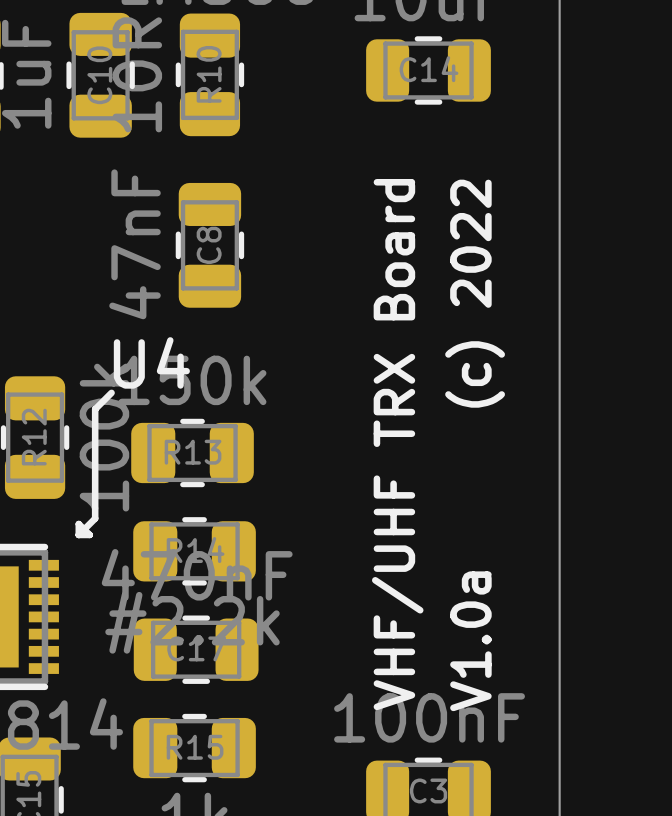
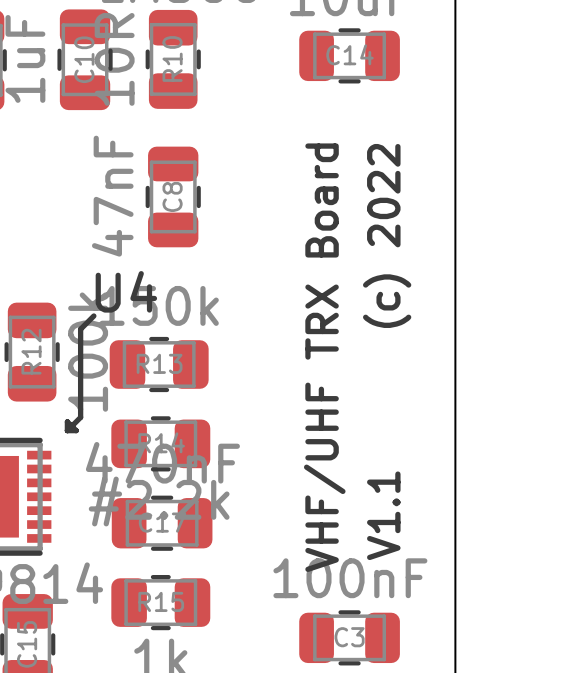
text: V1.0a (470, 641) -> V1.1 (383, 515)

